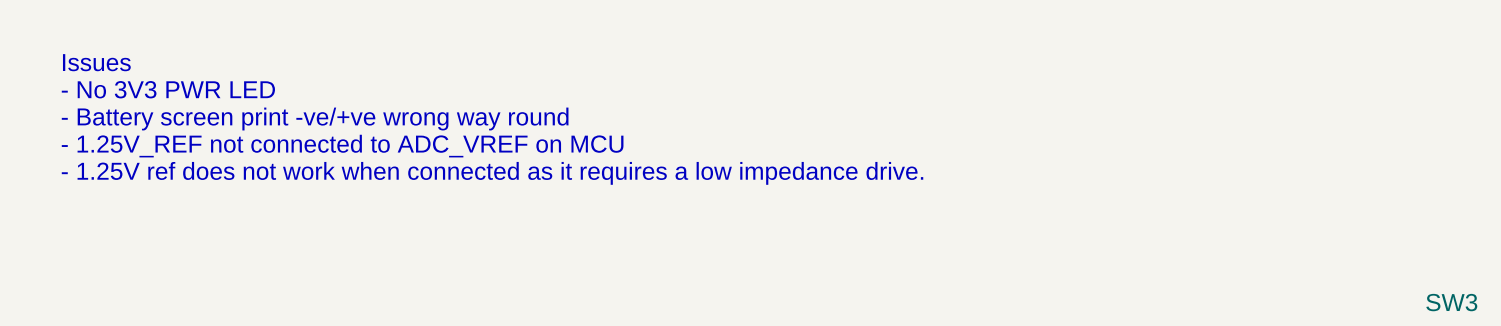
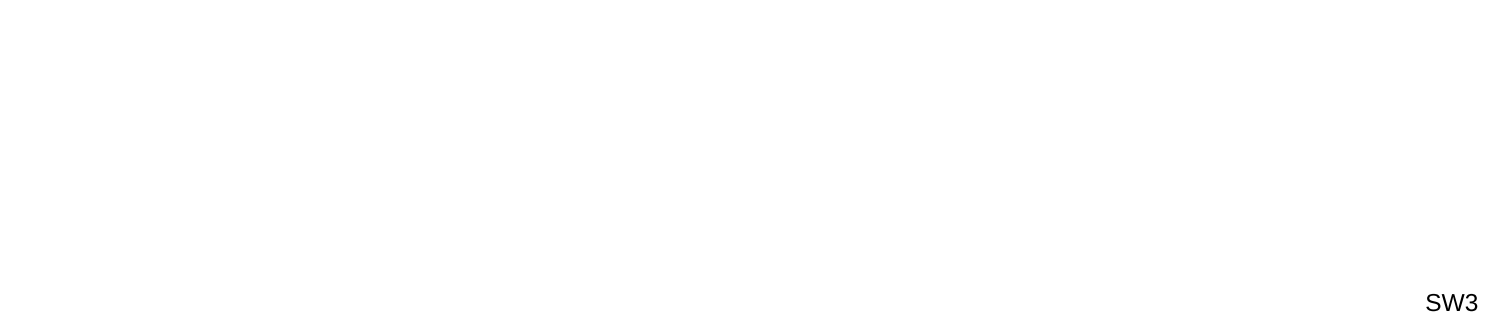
text: Issues (96, 62) -> none
text: - No 3V3 PWR LED (168, 89) -> none
text: - Battery screen print -ve/+ve wrong way round (315, 119) -> none
text: - 1.25V_REF not connected to ADC_VREF on MCU (342, 146) -> none
text: - 1.25V ref does not work when connected as it requires a low impedance drive. (492, 173) -> none

